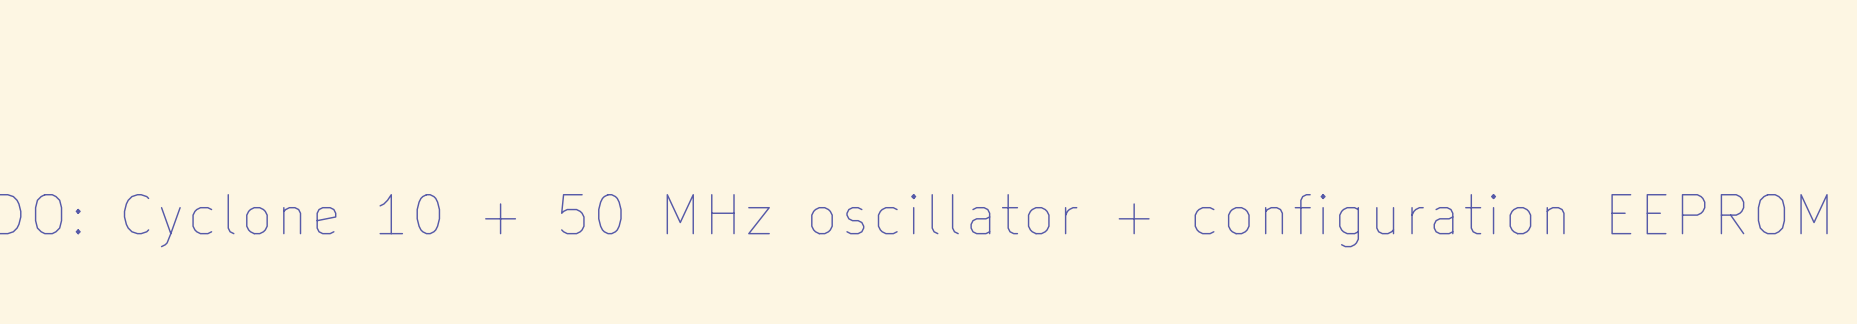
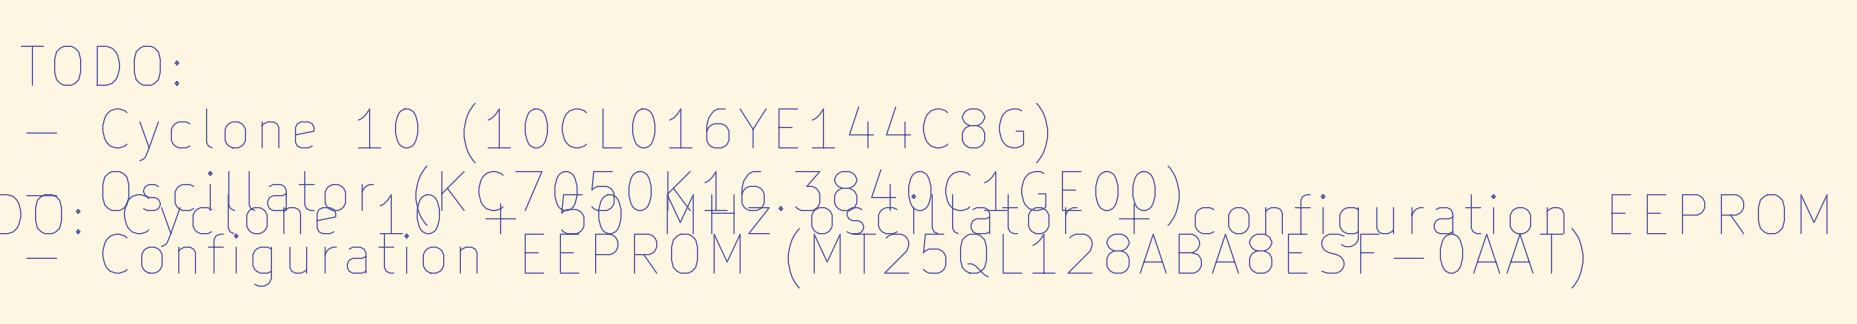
text: none -> TODO: (100, 65)
text: none -> - Cyclone 10 (10CL016YE144C8G) (537, 133)
text: none -> - Oscillator (KC7050K16.3840C1GE00) (603, 195)
text: none -> - Configuration EEPROM (MT25QL128ABA8ESF-0AAT) (804, 258)

